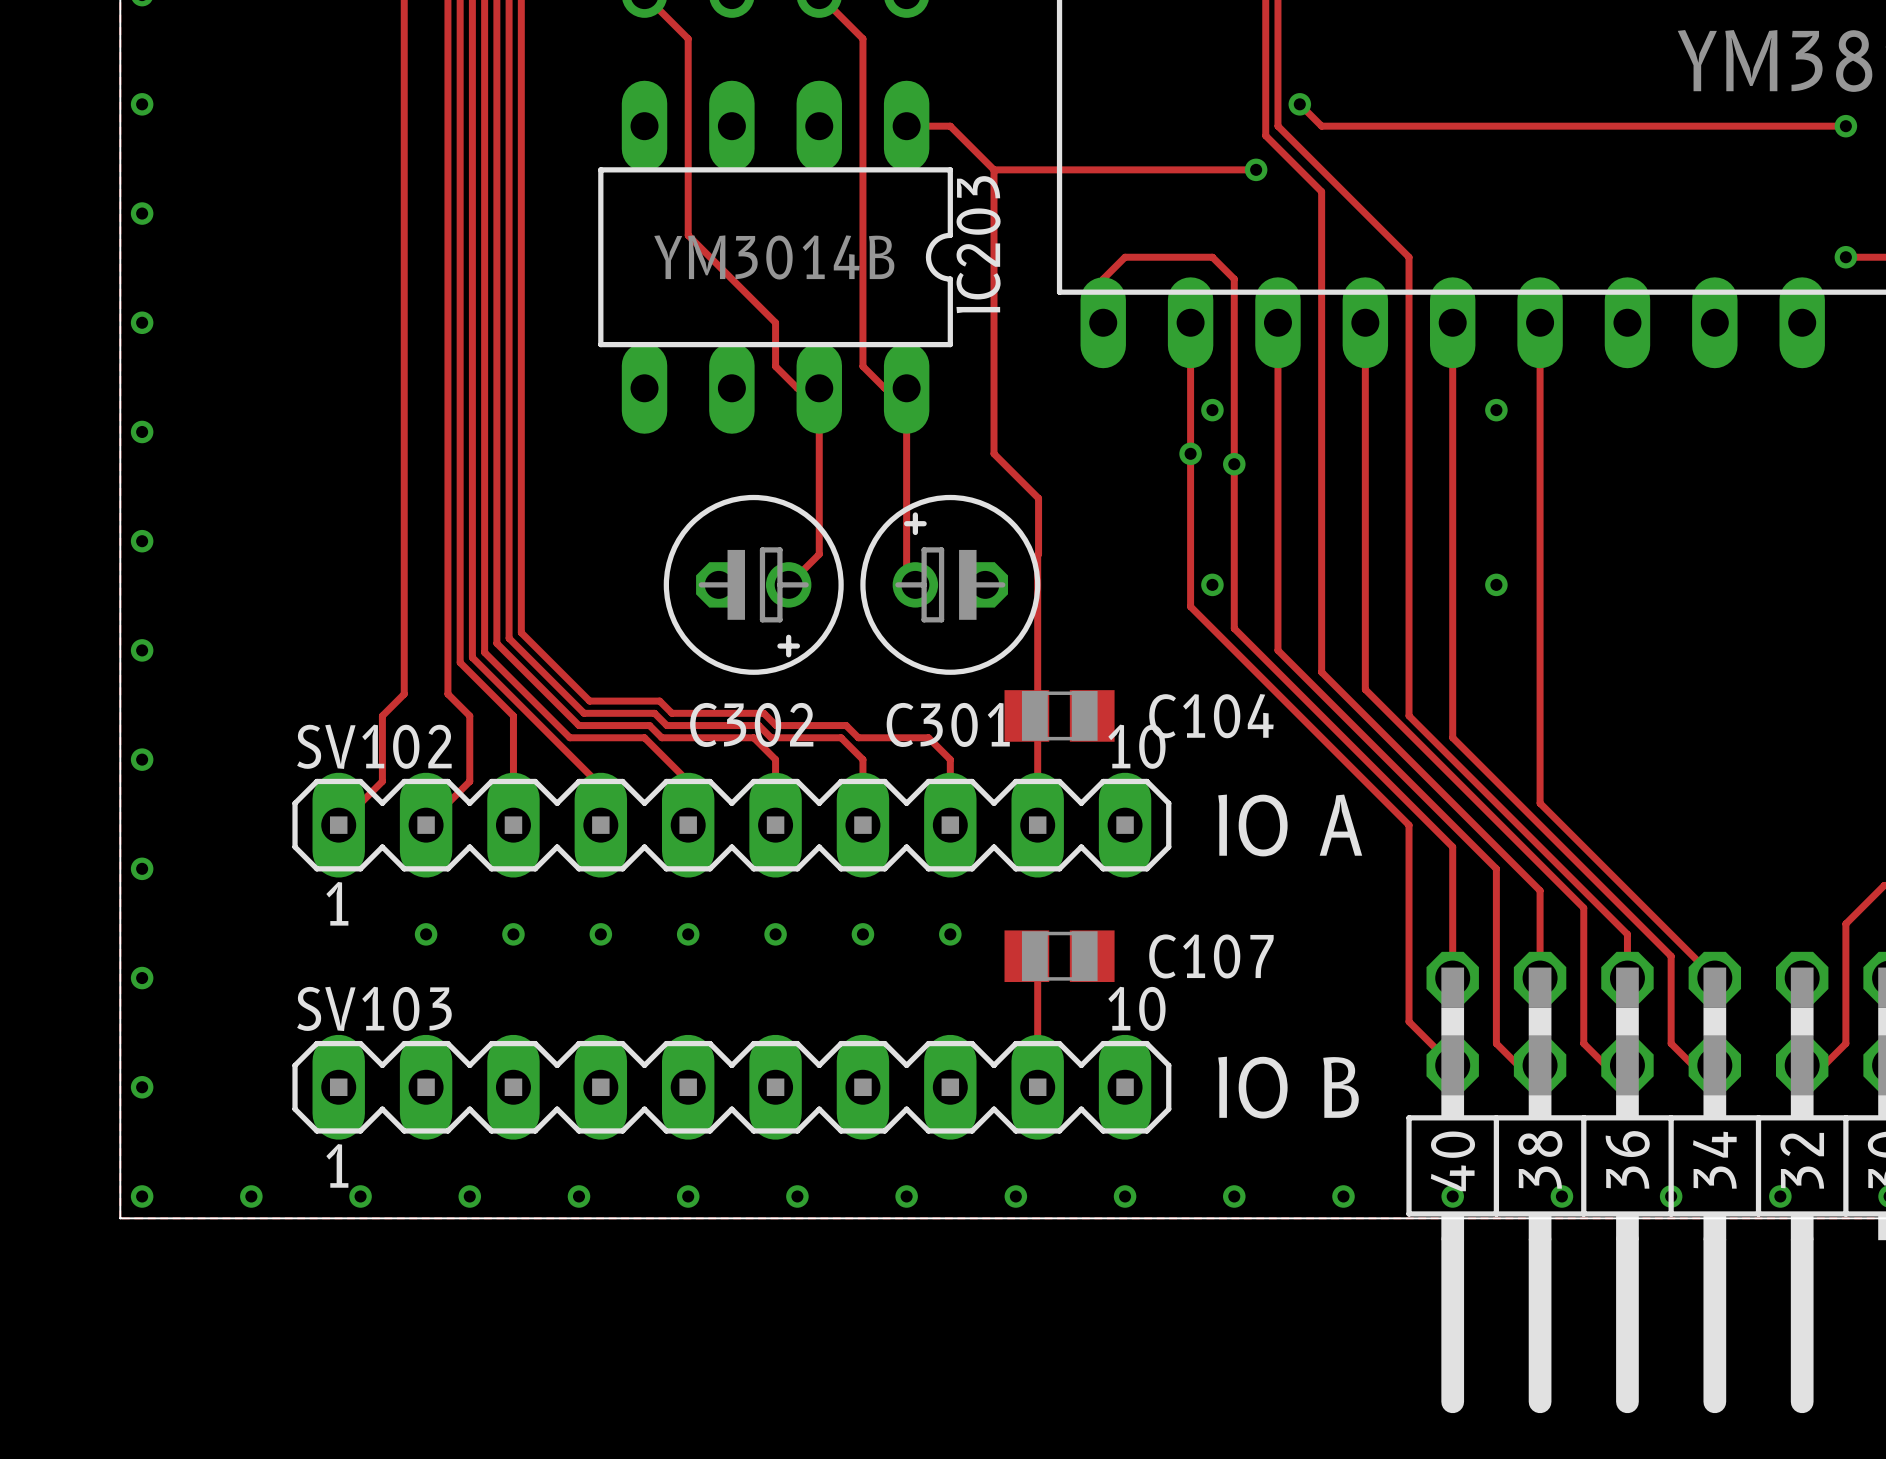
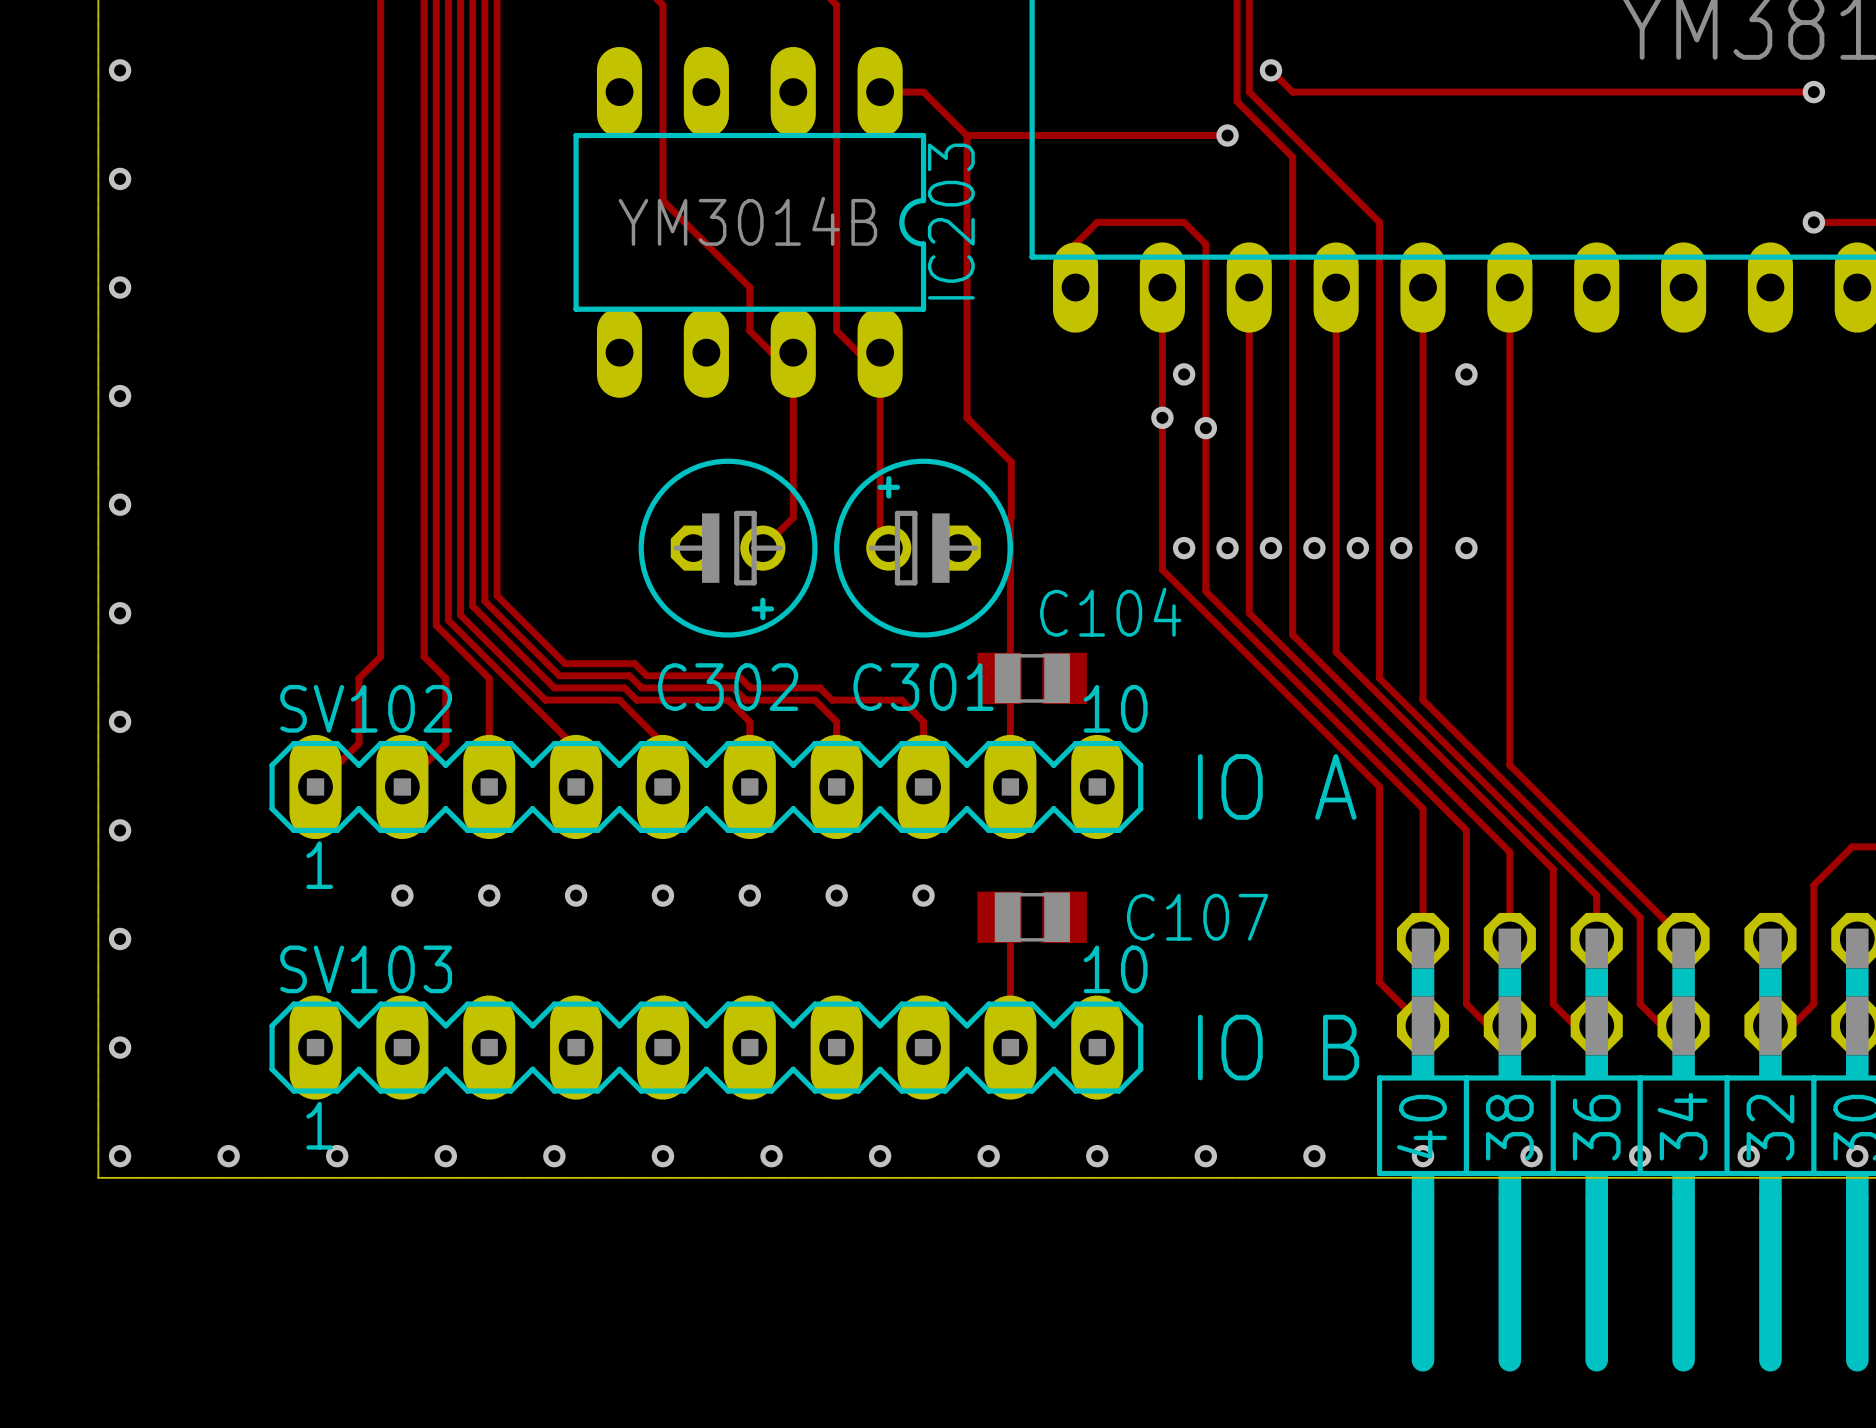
via: none -> (1227, 548)
via: none -> (1270, 548)
via: none -> (1314, 548)
via: none -> (1357, 548)
via: none -> (1401, 548)
C104 name position: C104 (1211, 716) -> C104 (1110, 612)

